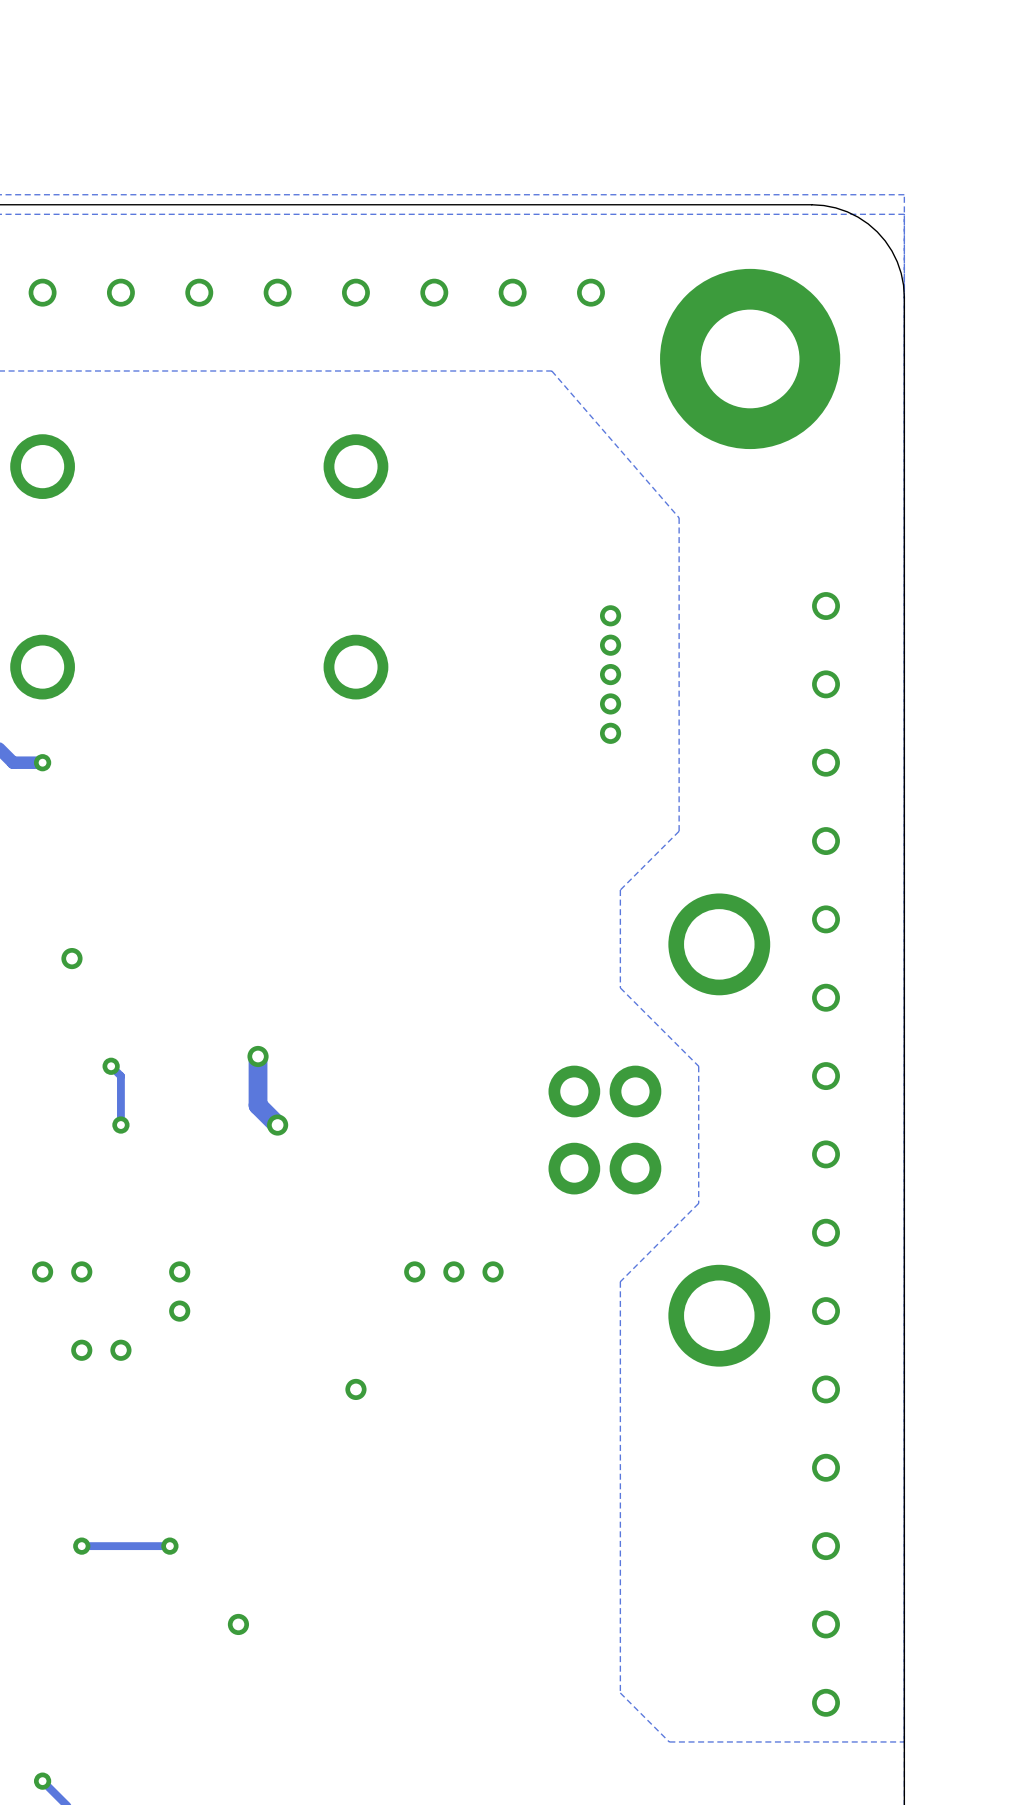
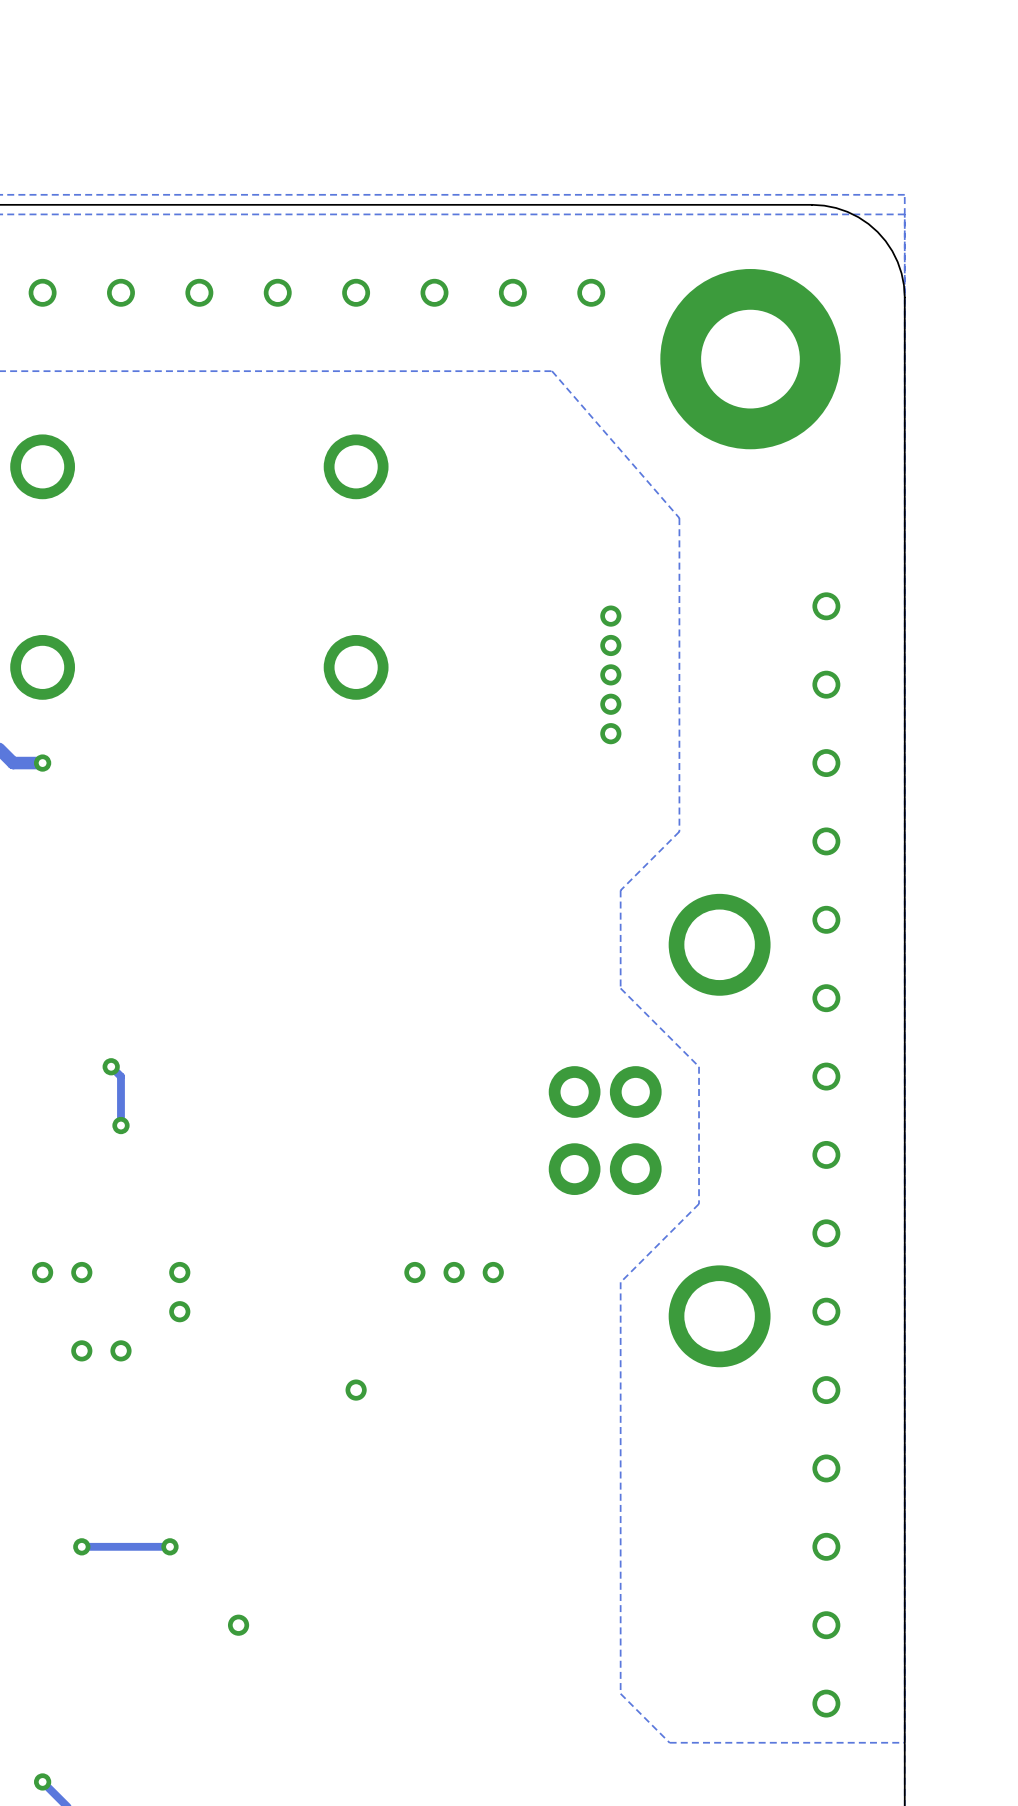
via: (71, 958) -> none
track: (258, 1056) (258, 1105) (277, 1125) -> none
via: (258, 1056) -> none
via: (277, 1125) -> none

